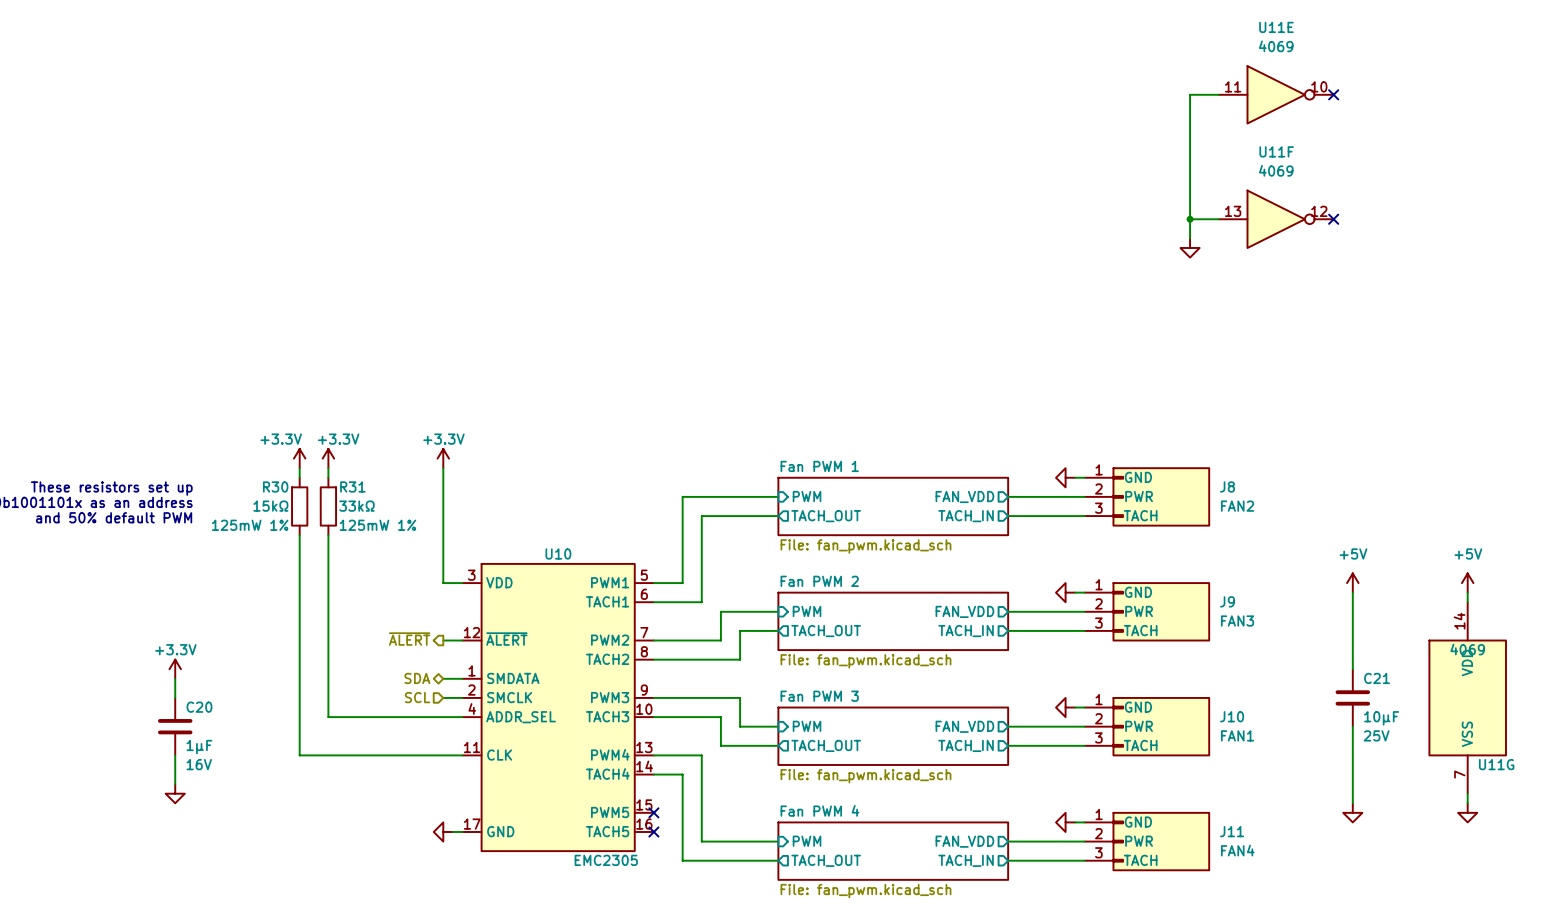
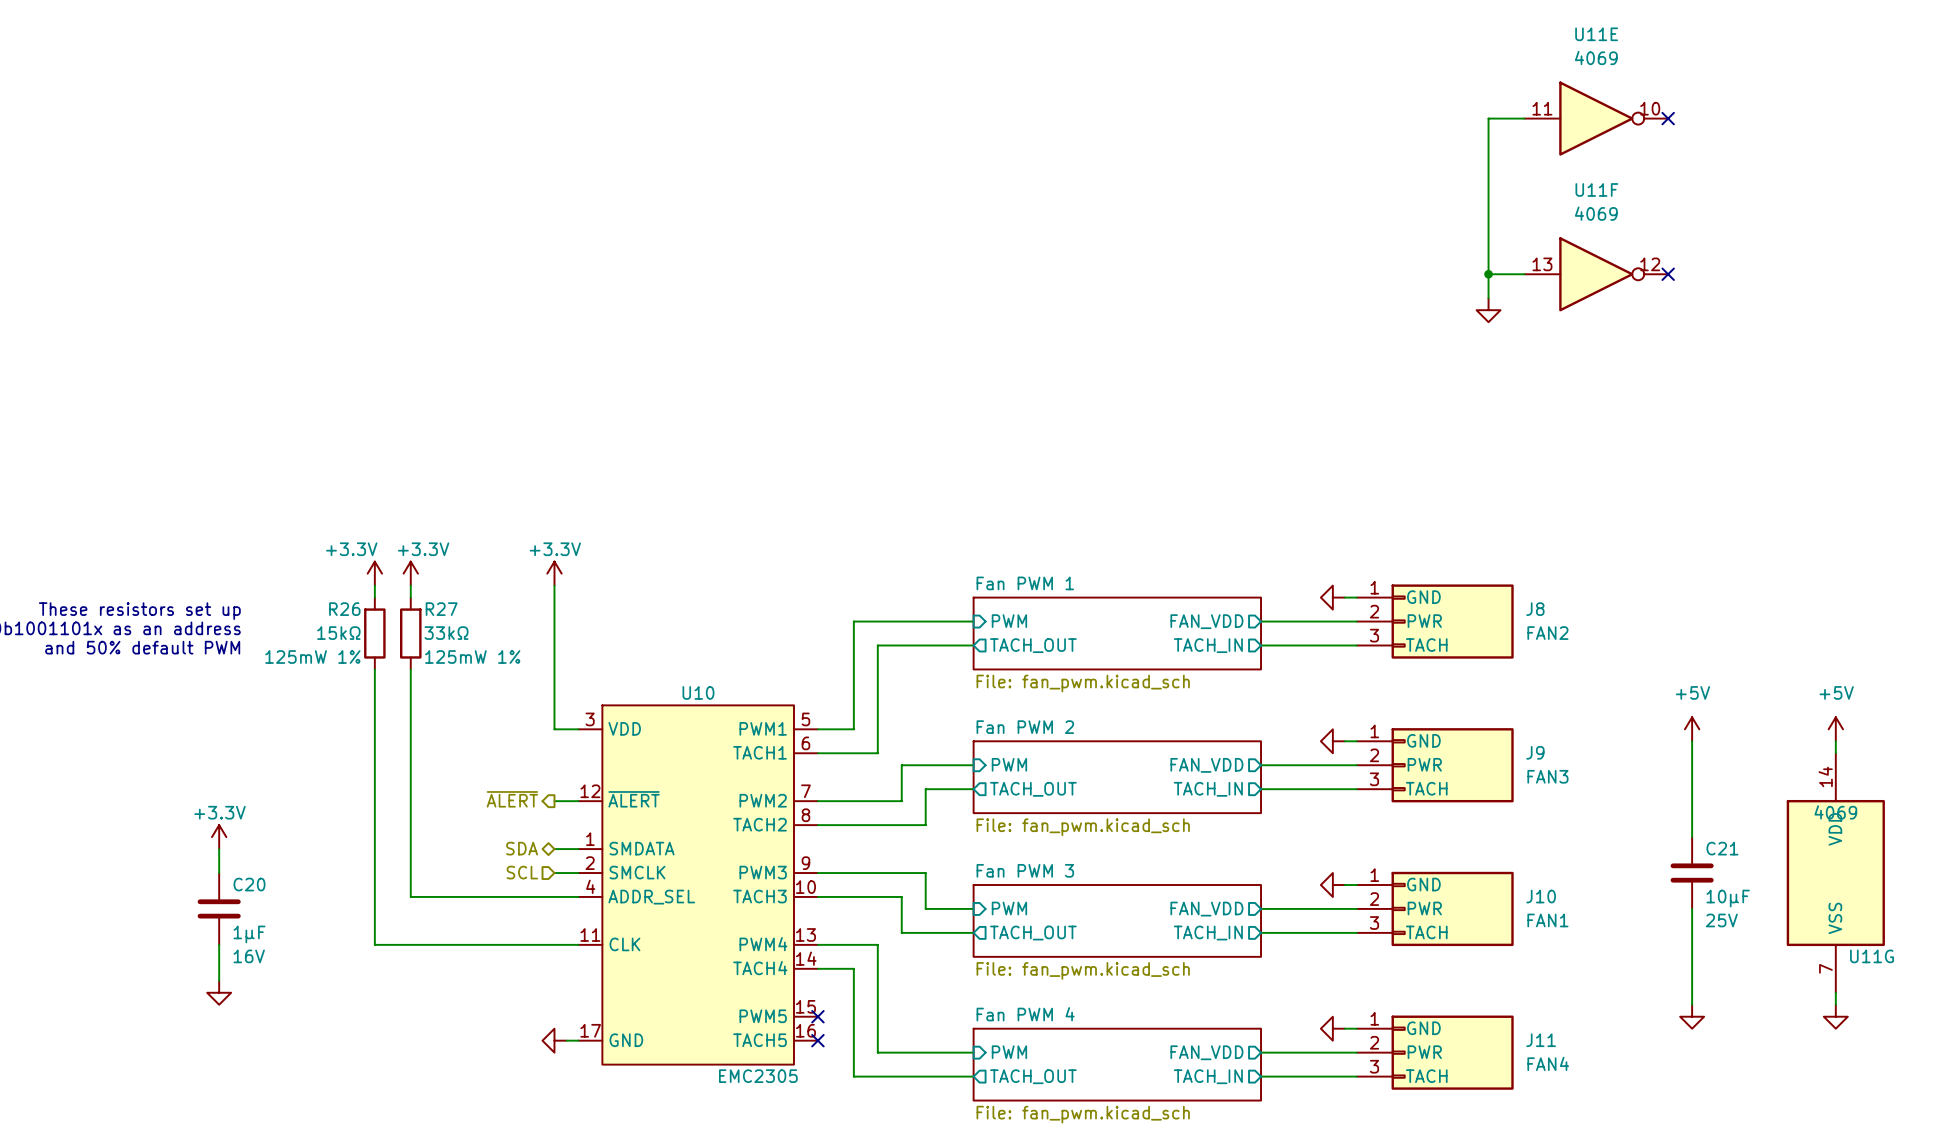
R30 name: R30 (275, 486) -> R26 (344, 609)
R31 name: R31 (352, 486) -> R27 (441, 609)

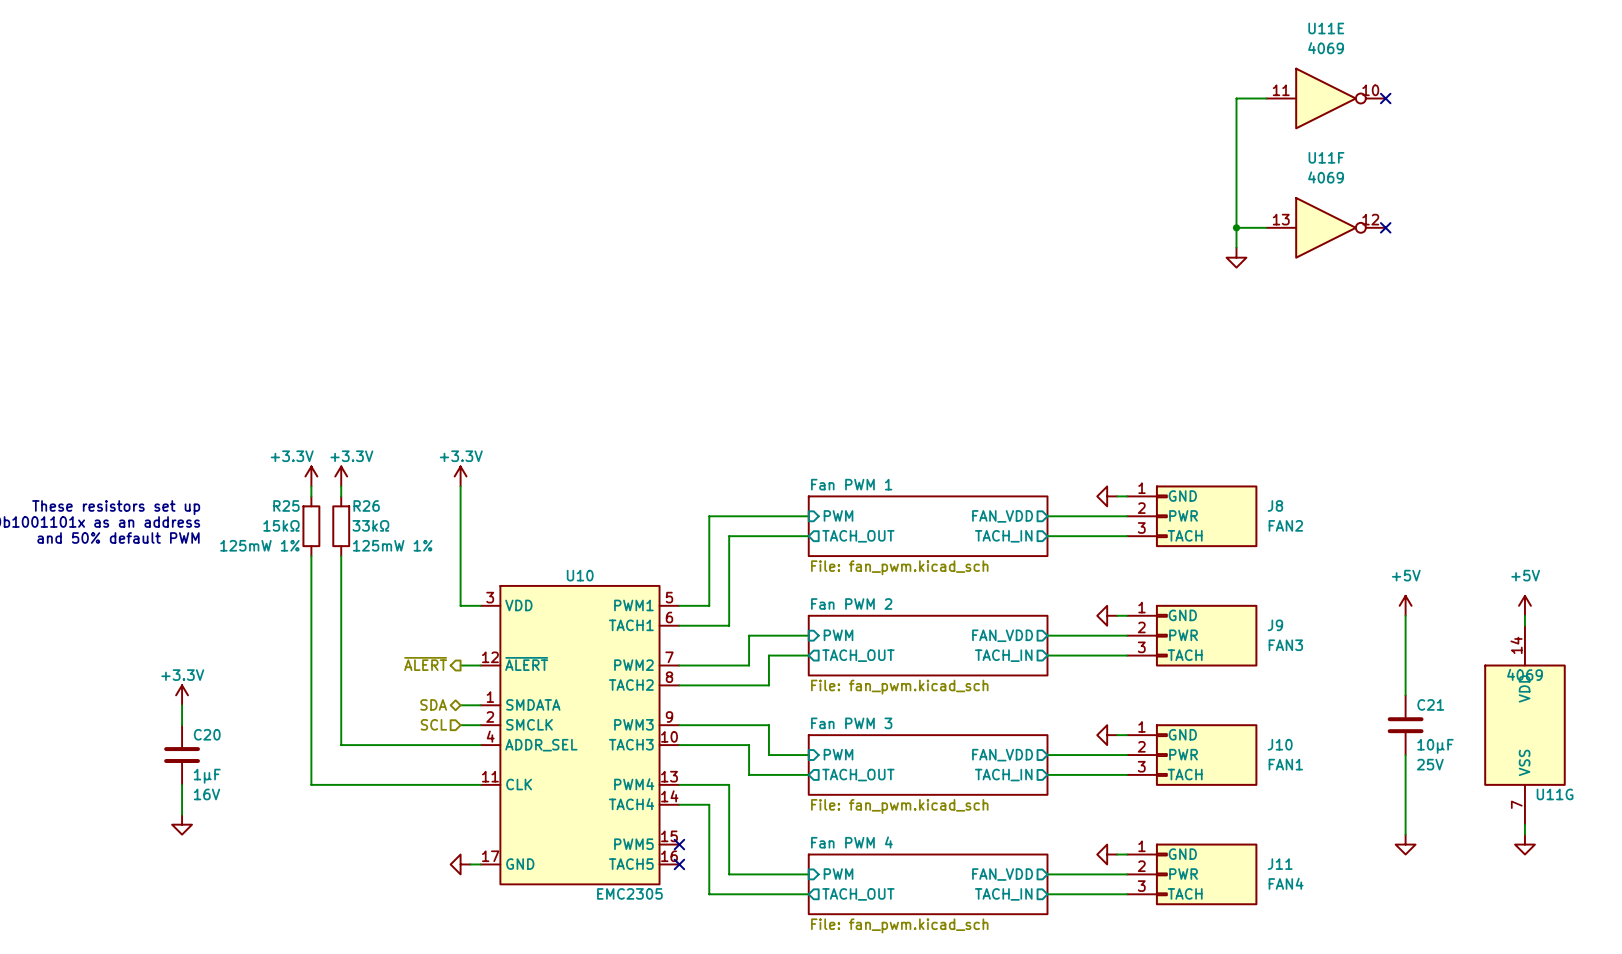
R26 name: R26 (344, 609) -> R25 (286, 505)
R27 name: R27 (441, 609) -> R26 (366, 505)

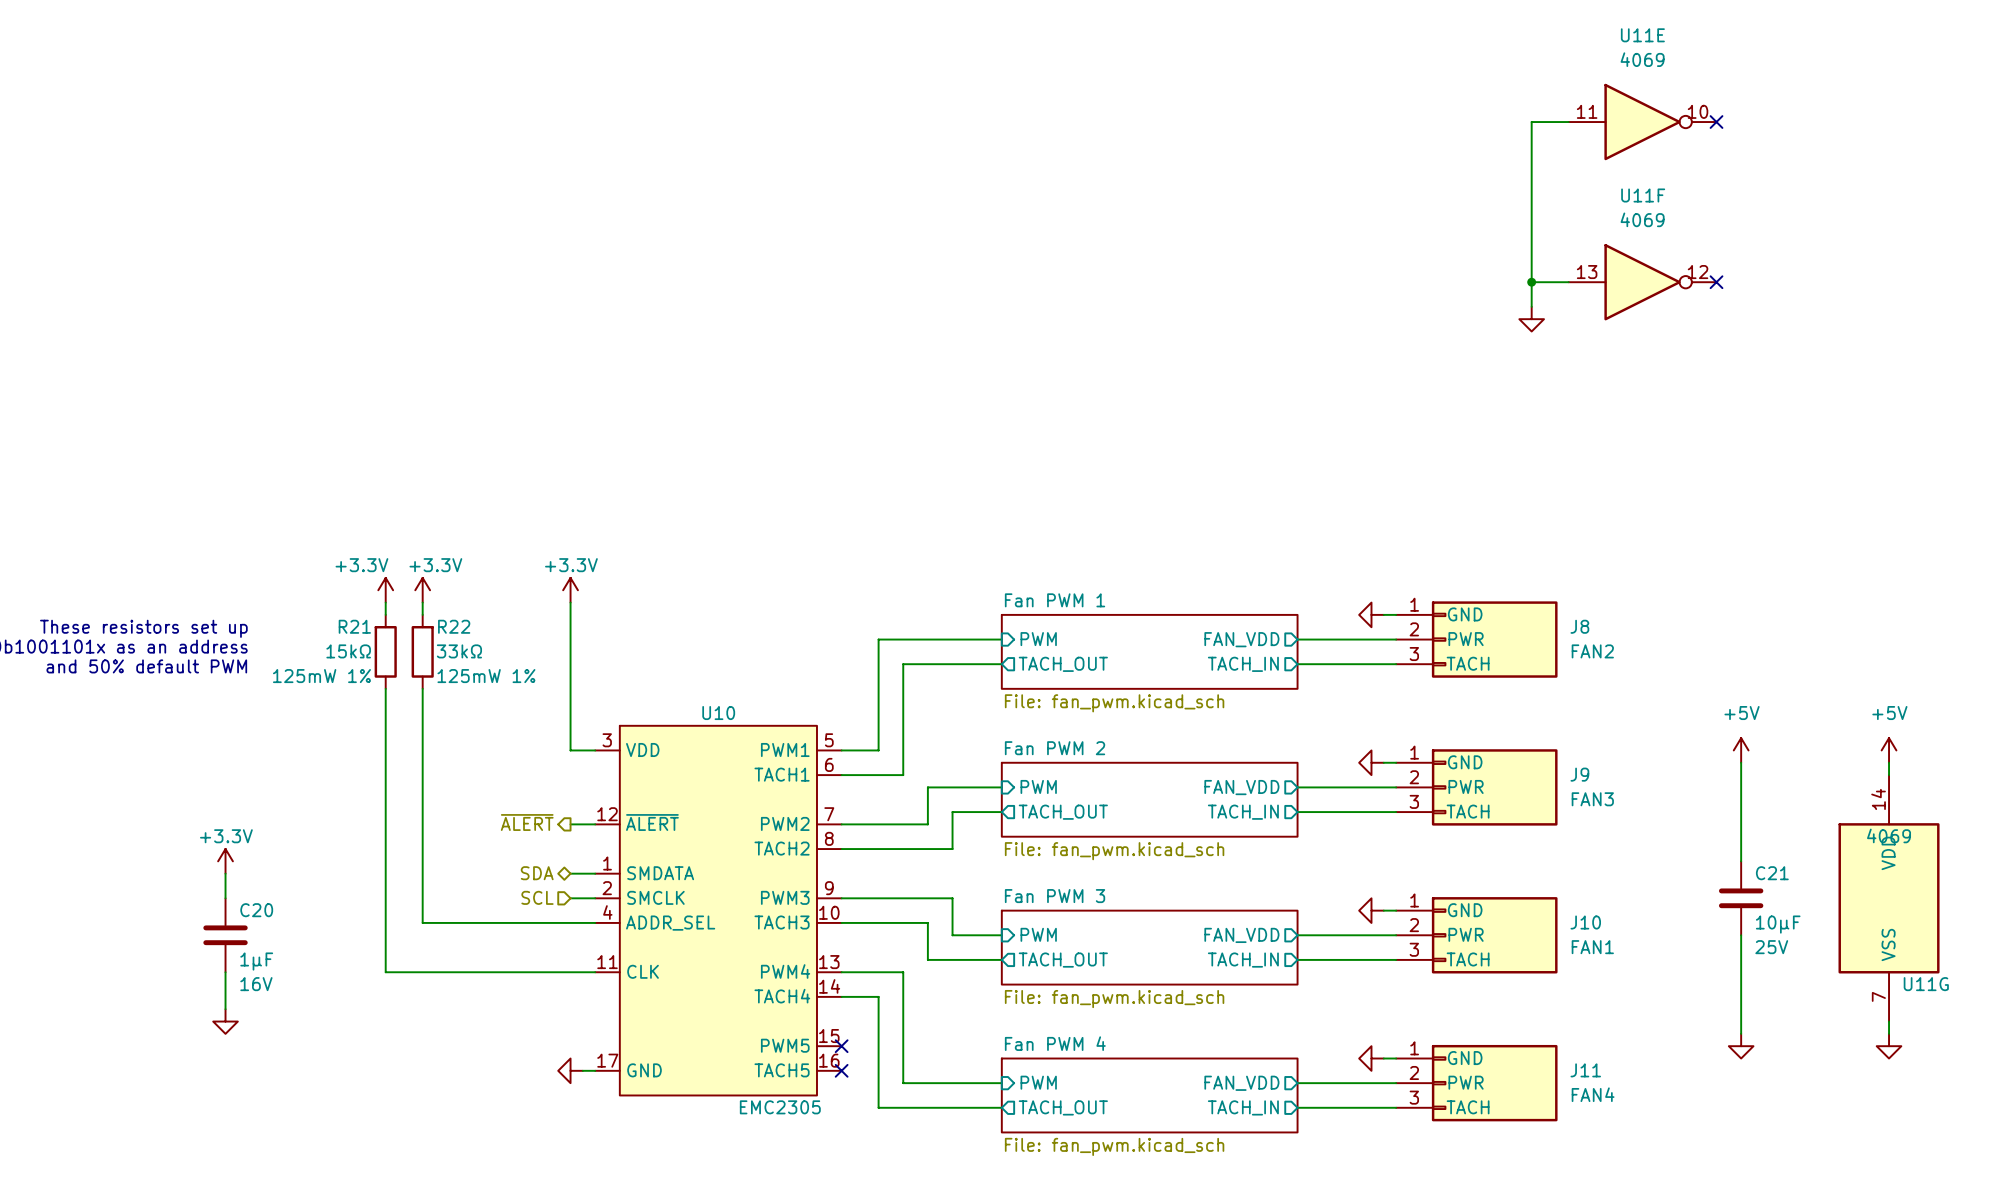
R25 name: R25 (286, 505) -> R21 (354, 626)
R26 name: R26 (366, 505) -> R22 (454, 626)

